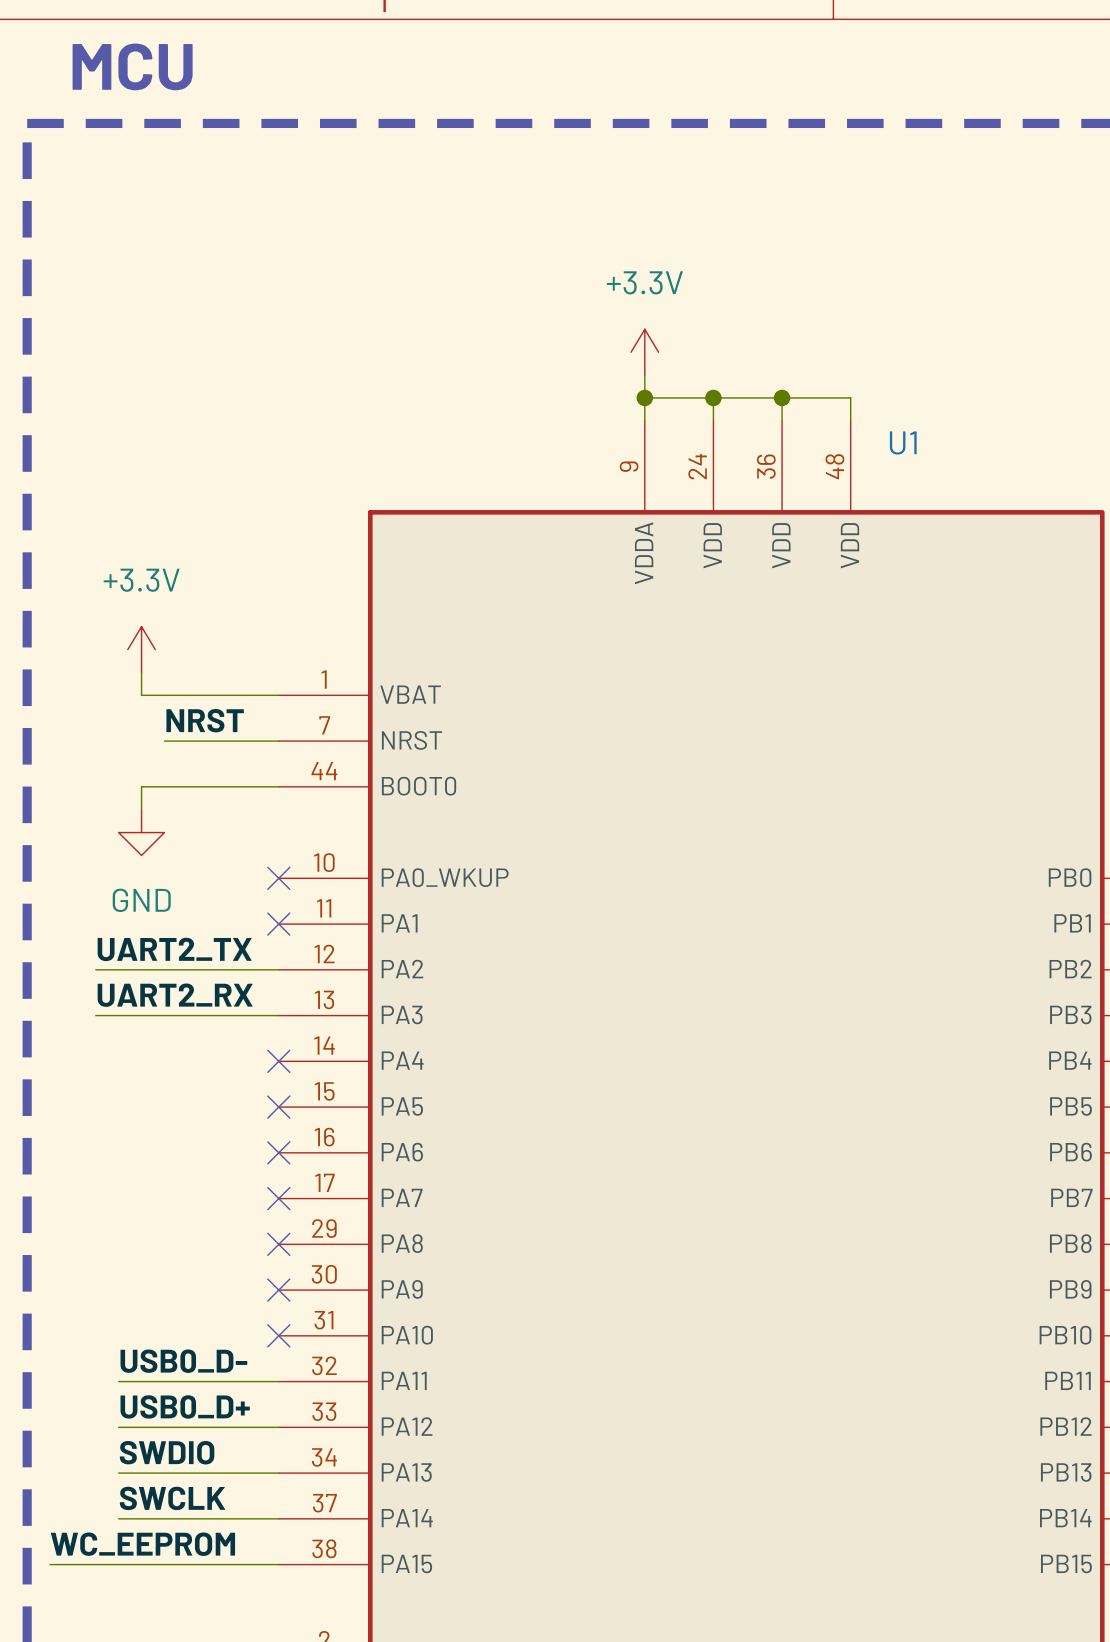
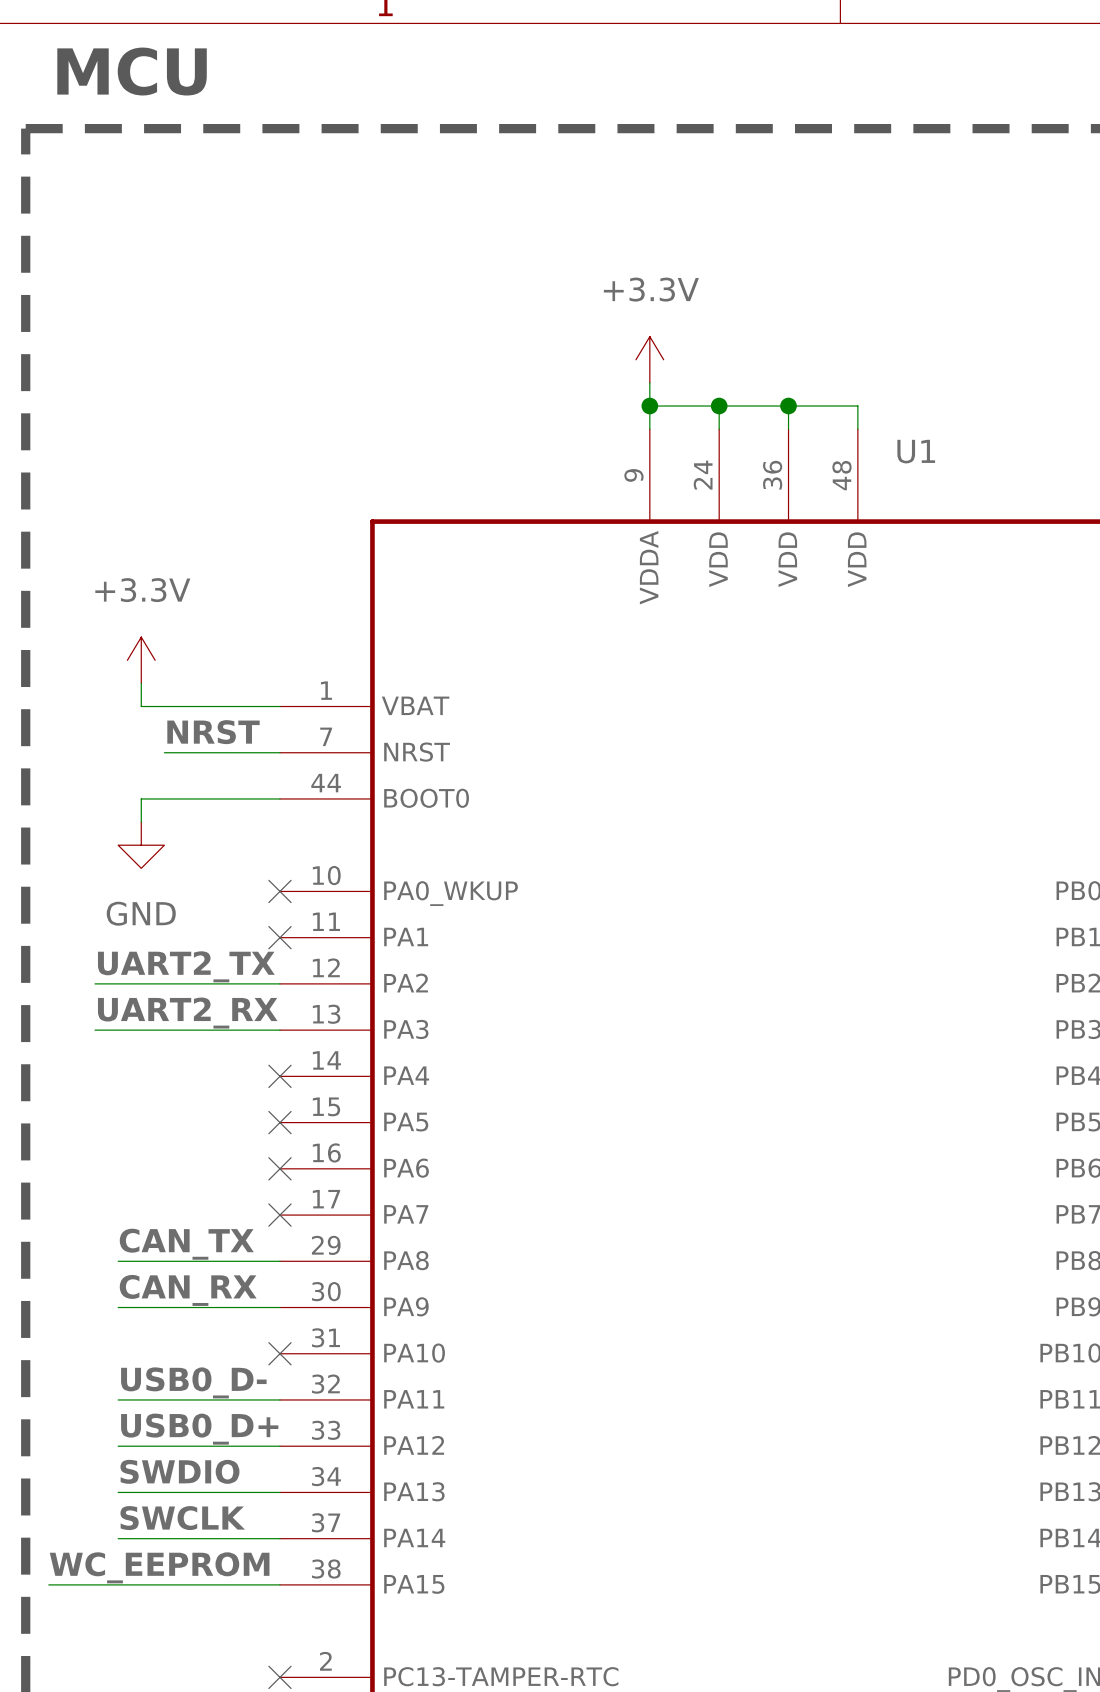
label: none -> CAN_TX (186, 1244)
wire: none -> (118, 1261) (279, 1261)
no-connect mark: (278, 1244) -> none
label: none -> CAN_RX (188, 1290)
wire: none -> (118, 1307) (279, 1307)
no-connect mark: (278, 1290) -> none

